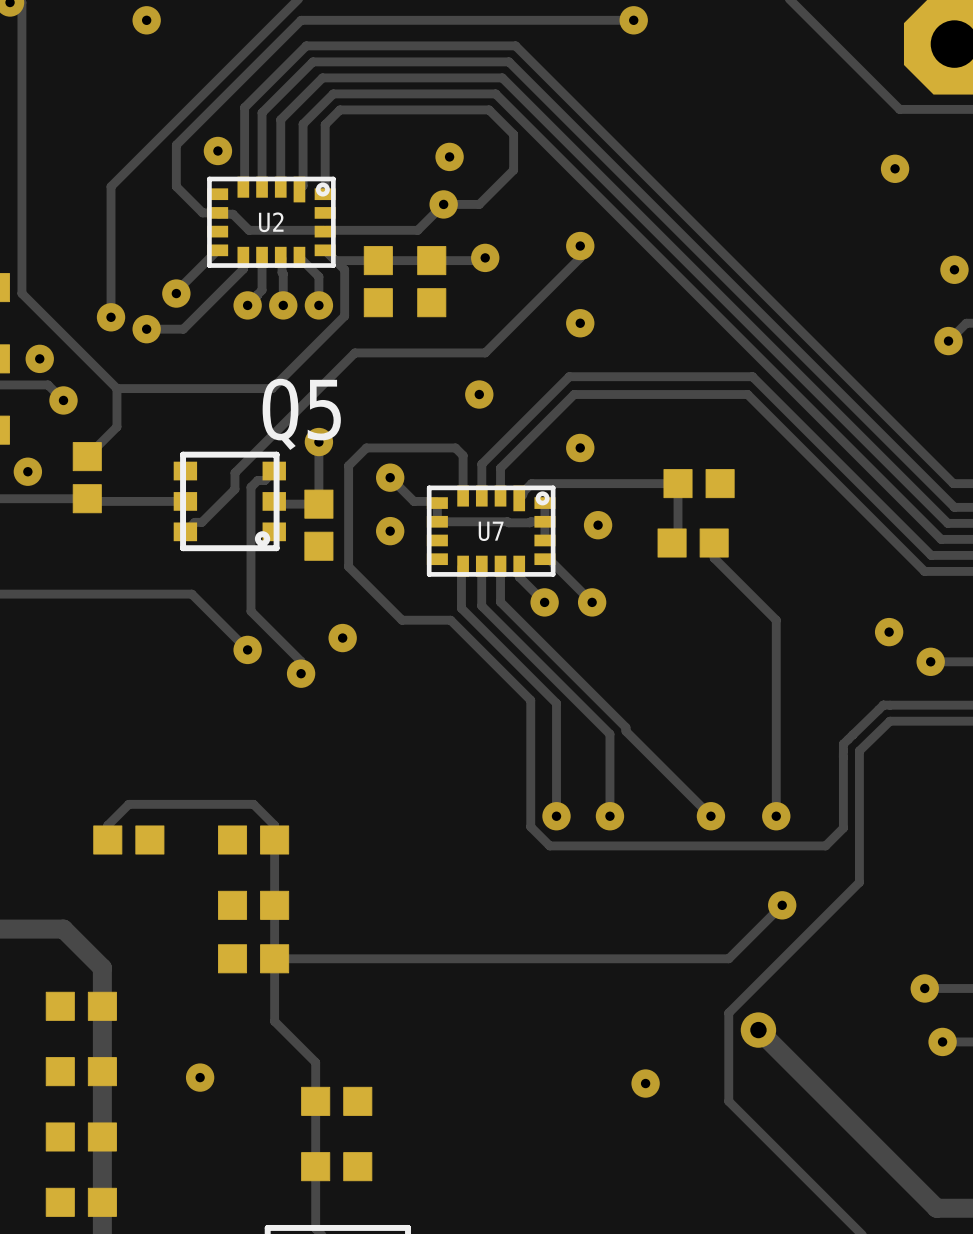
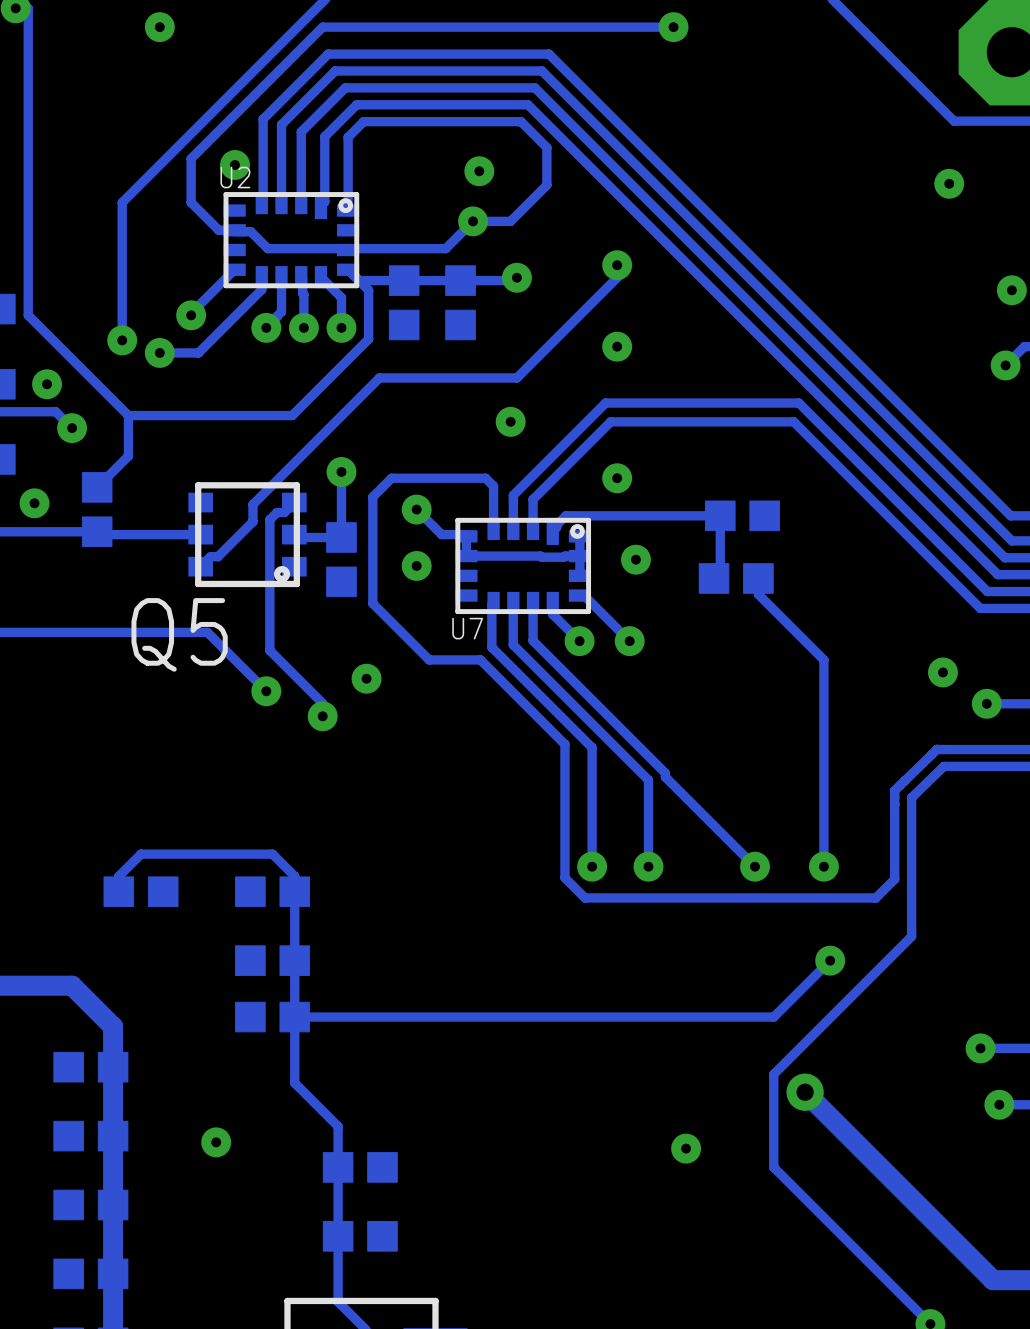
U2 name position: U2 (271, 222) -> U2 (235, 177)
Q5 name position: Q5 (301, 414) -> Q5 (179, 634)
U7 name position: U7 (491, 531) -> U7 (467, 628)

